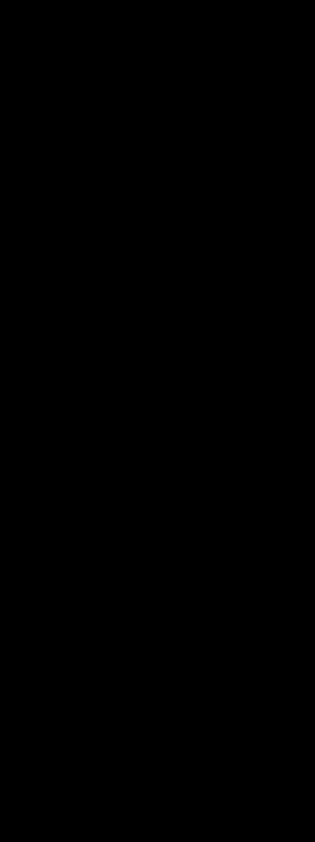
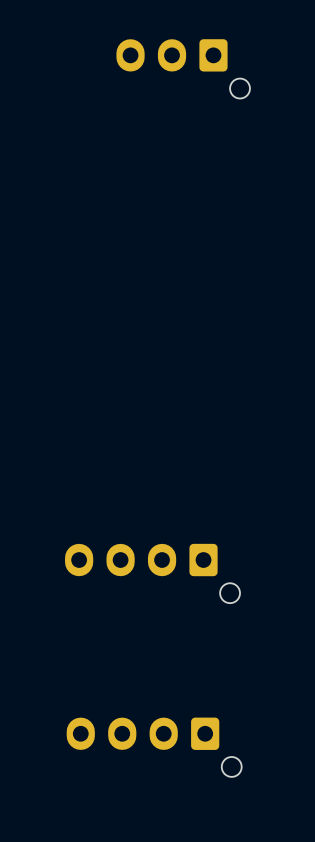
part: none -> (183, 68)
part: none -> (152, 573)
part: none -> (154, 747)

